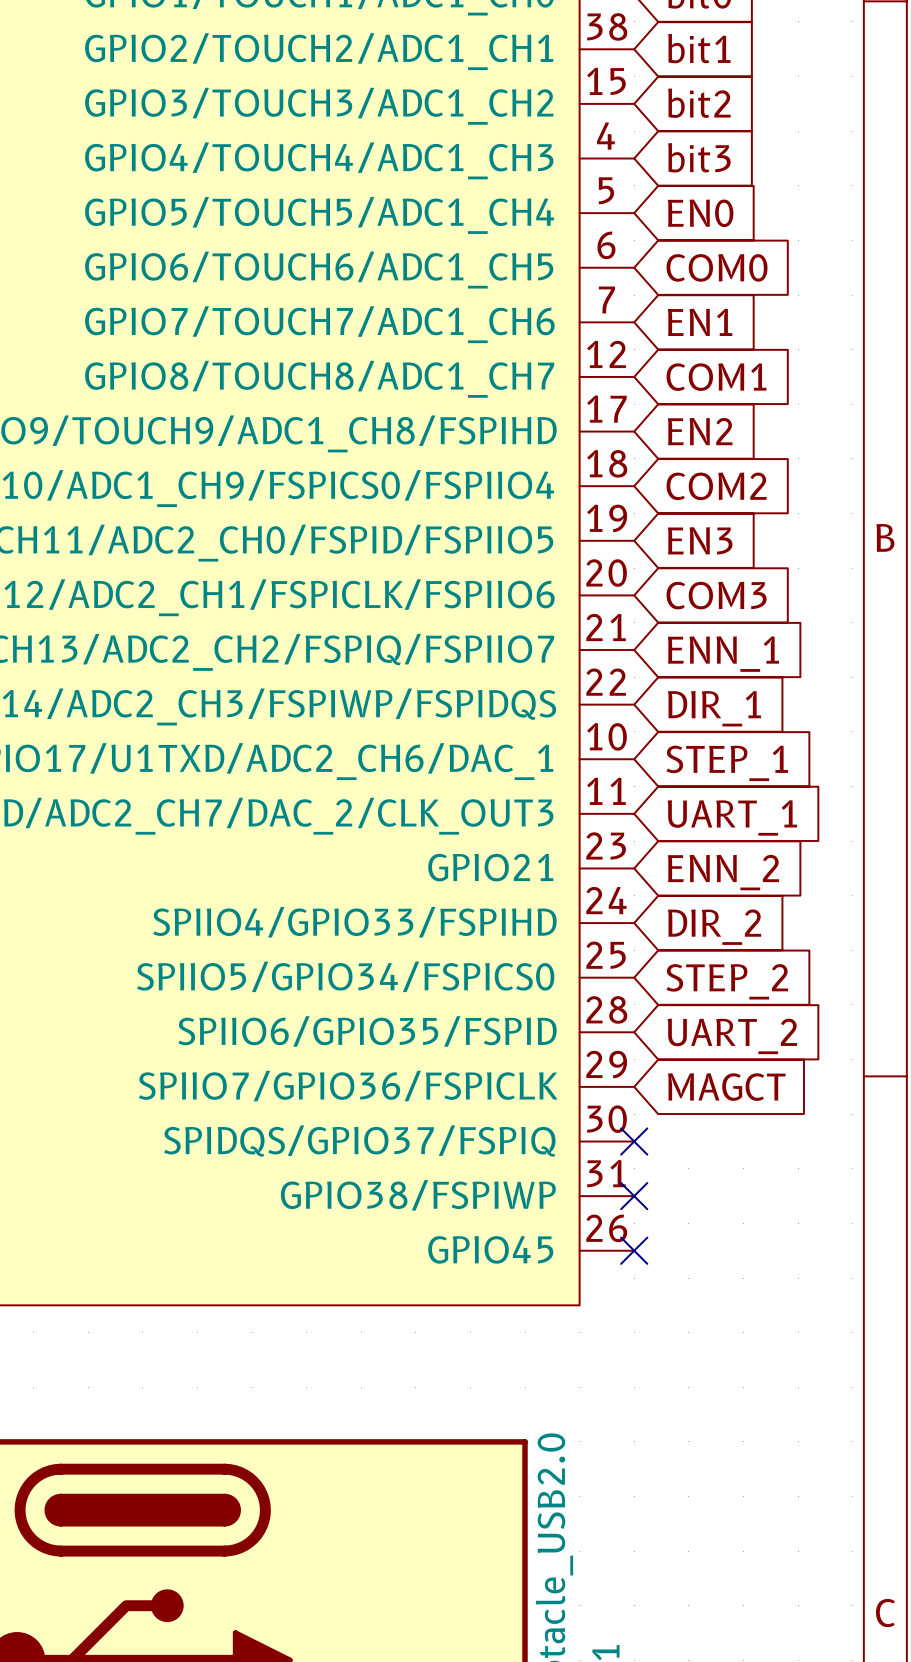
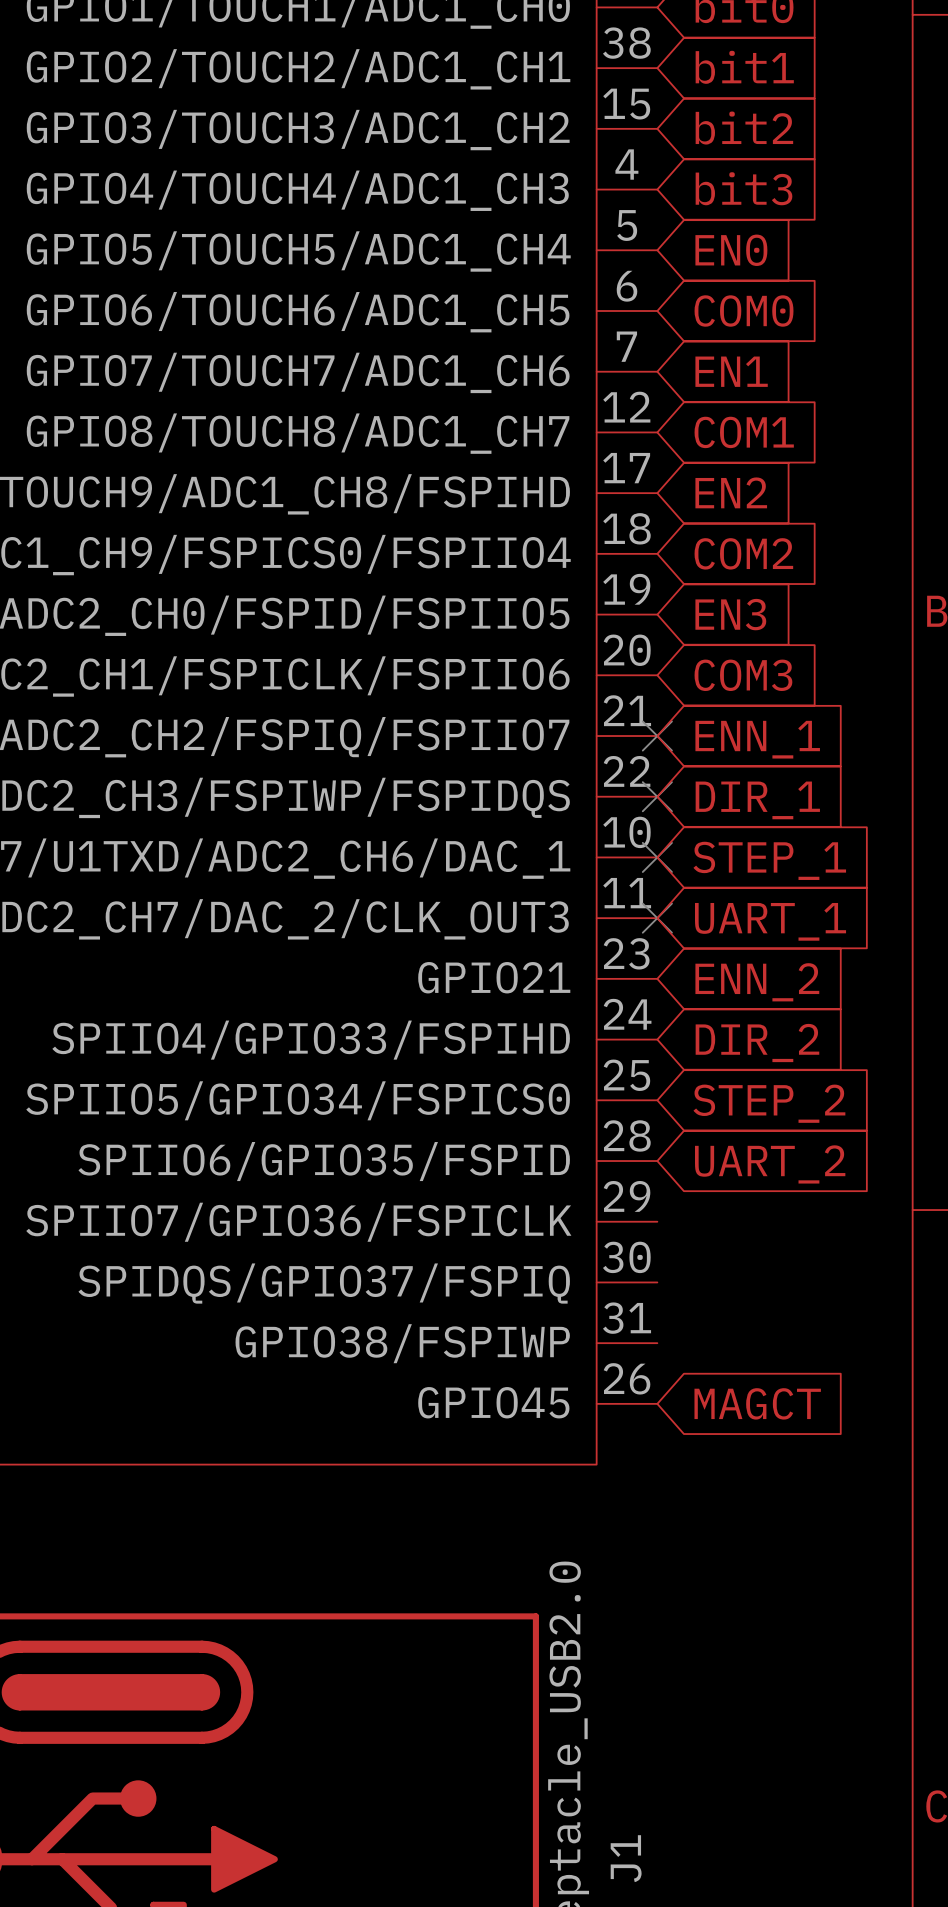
no-connect mark: none -> (657, 736)
no-connect mark: none -> (657, 796)
no-connect mark: none -> (657, 857)
no-connect mark: none -> (657, 918)
global label position: MAGCT (726, 1087) -> MAGCT (757, 1403)
no-connect mark: (634, 1141) -> none
no-connect mark: (634, 1196) -> none
no-connect mark: (634, 1250) -> none

